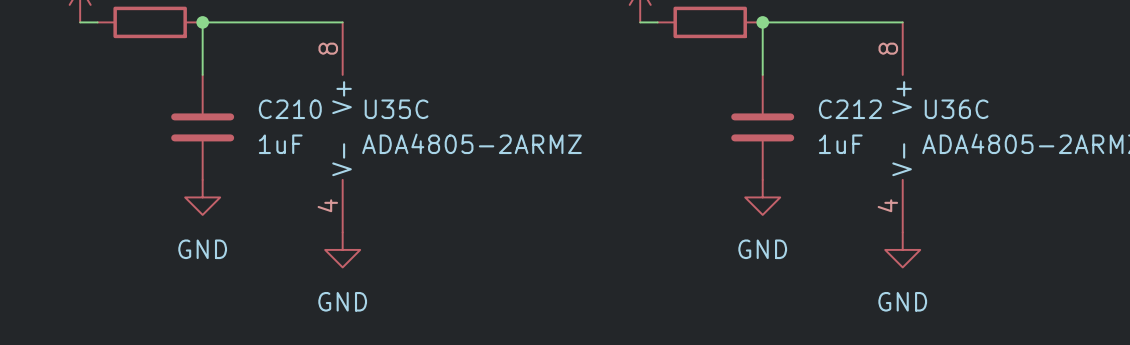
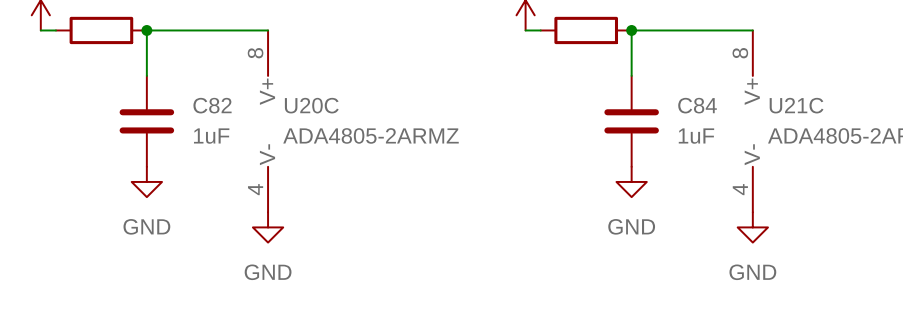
C210 name: C210 (290, 109) -> C82 (212, 105)
U35C name: U35C (396, 109) -> U20C (311, 105)
C212 name: C212 (850, 109) -> C84 (697, 105)
U36C name: U36C (956, 109) -> U21C (796, 105)

